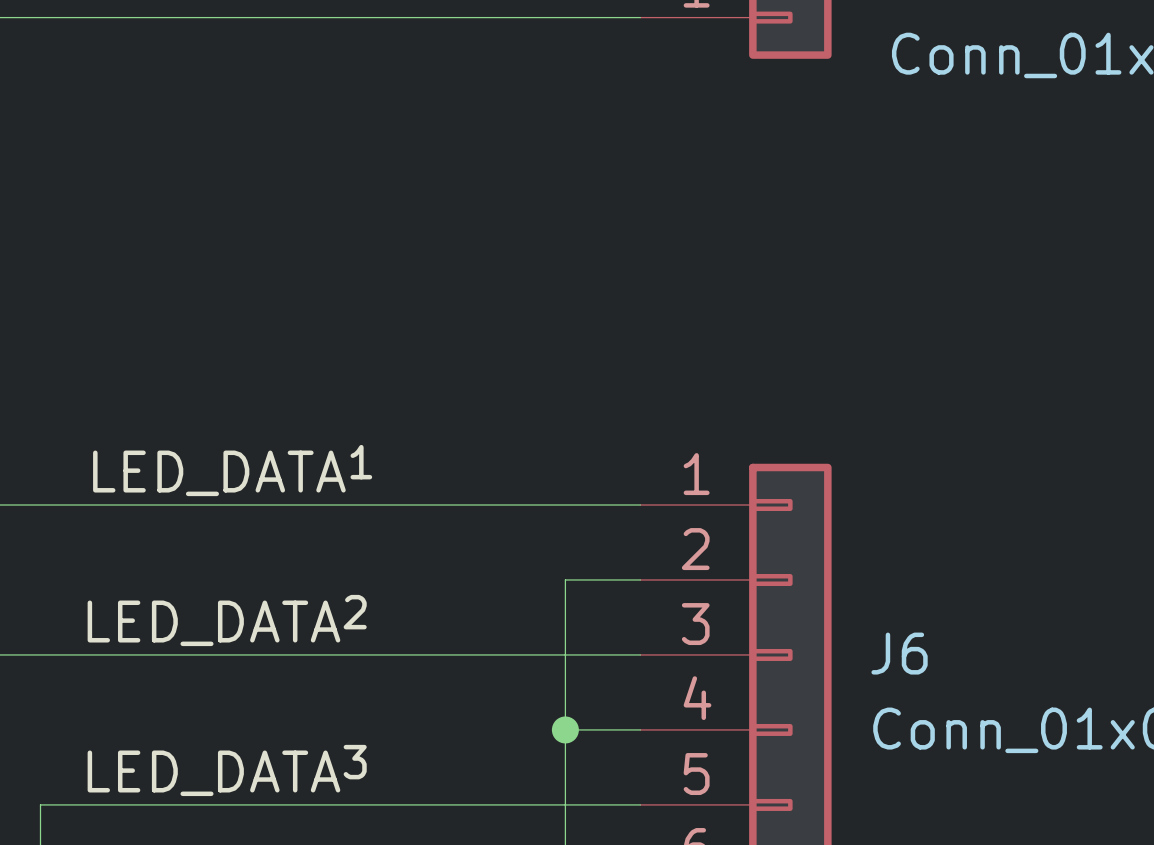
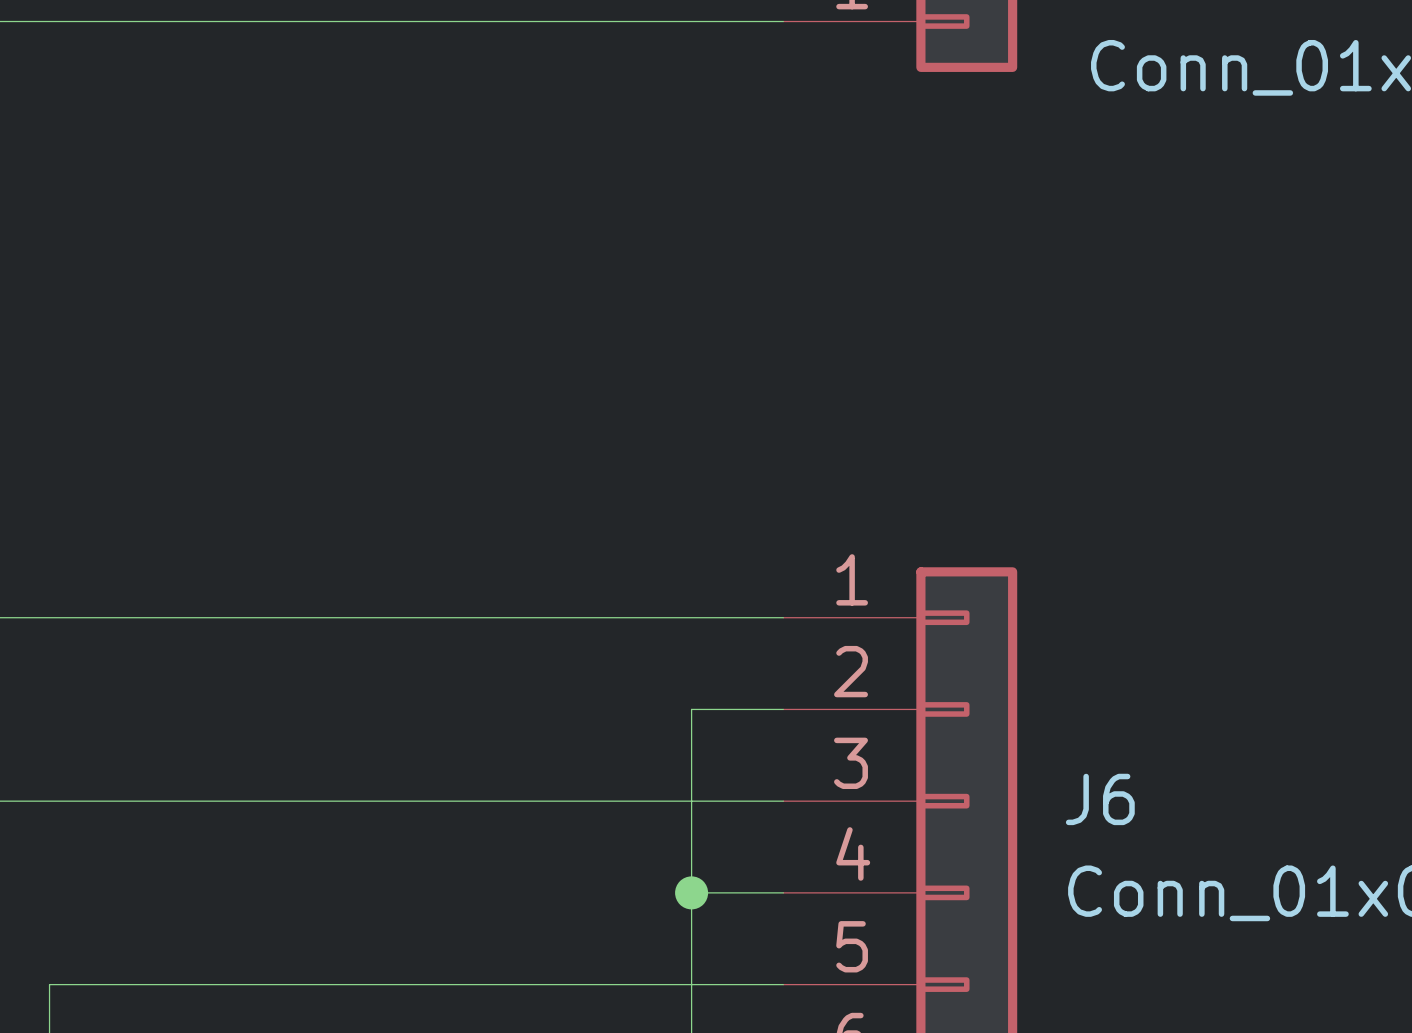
label: LED_DATA1 (232, 470) -> none
label: LED_DATA2 (227, 620) -> none
label: LED_DATA3 (227, 770) -> none

